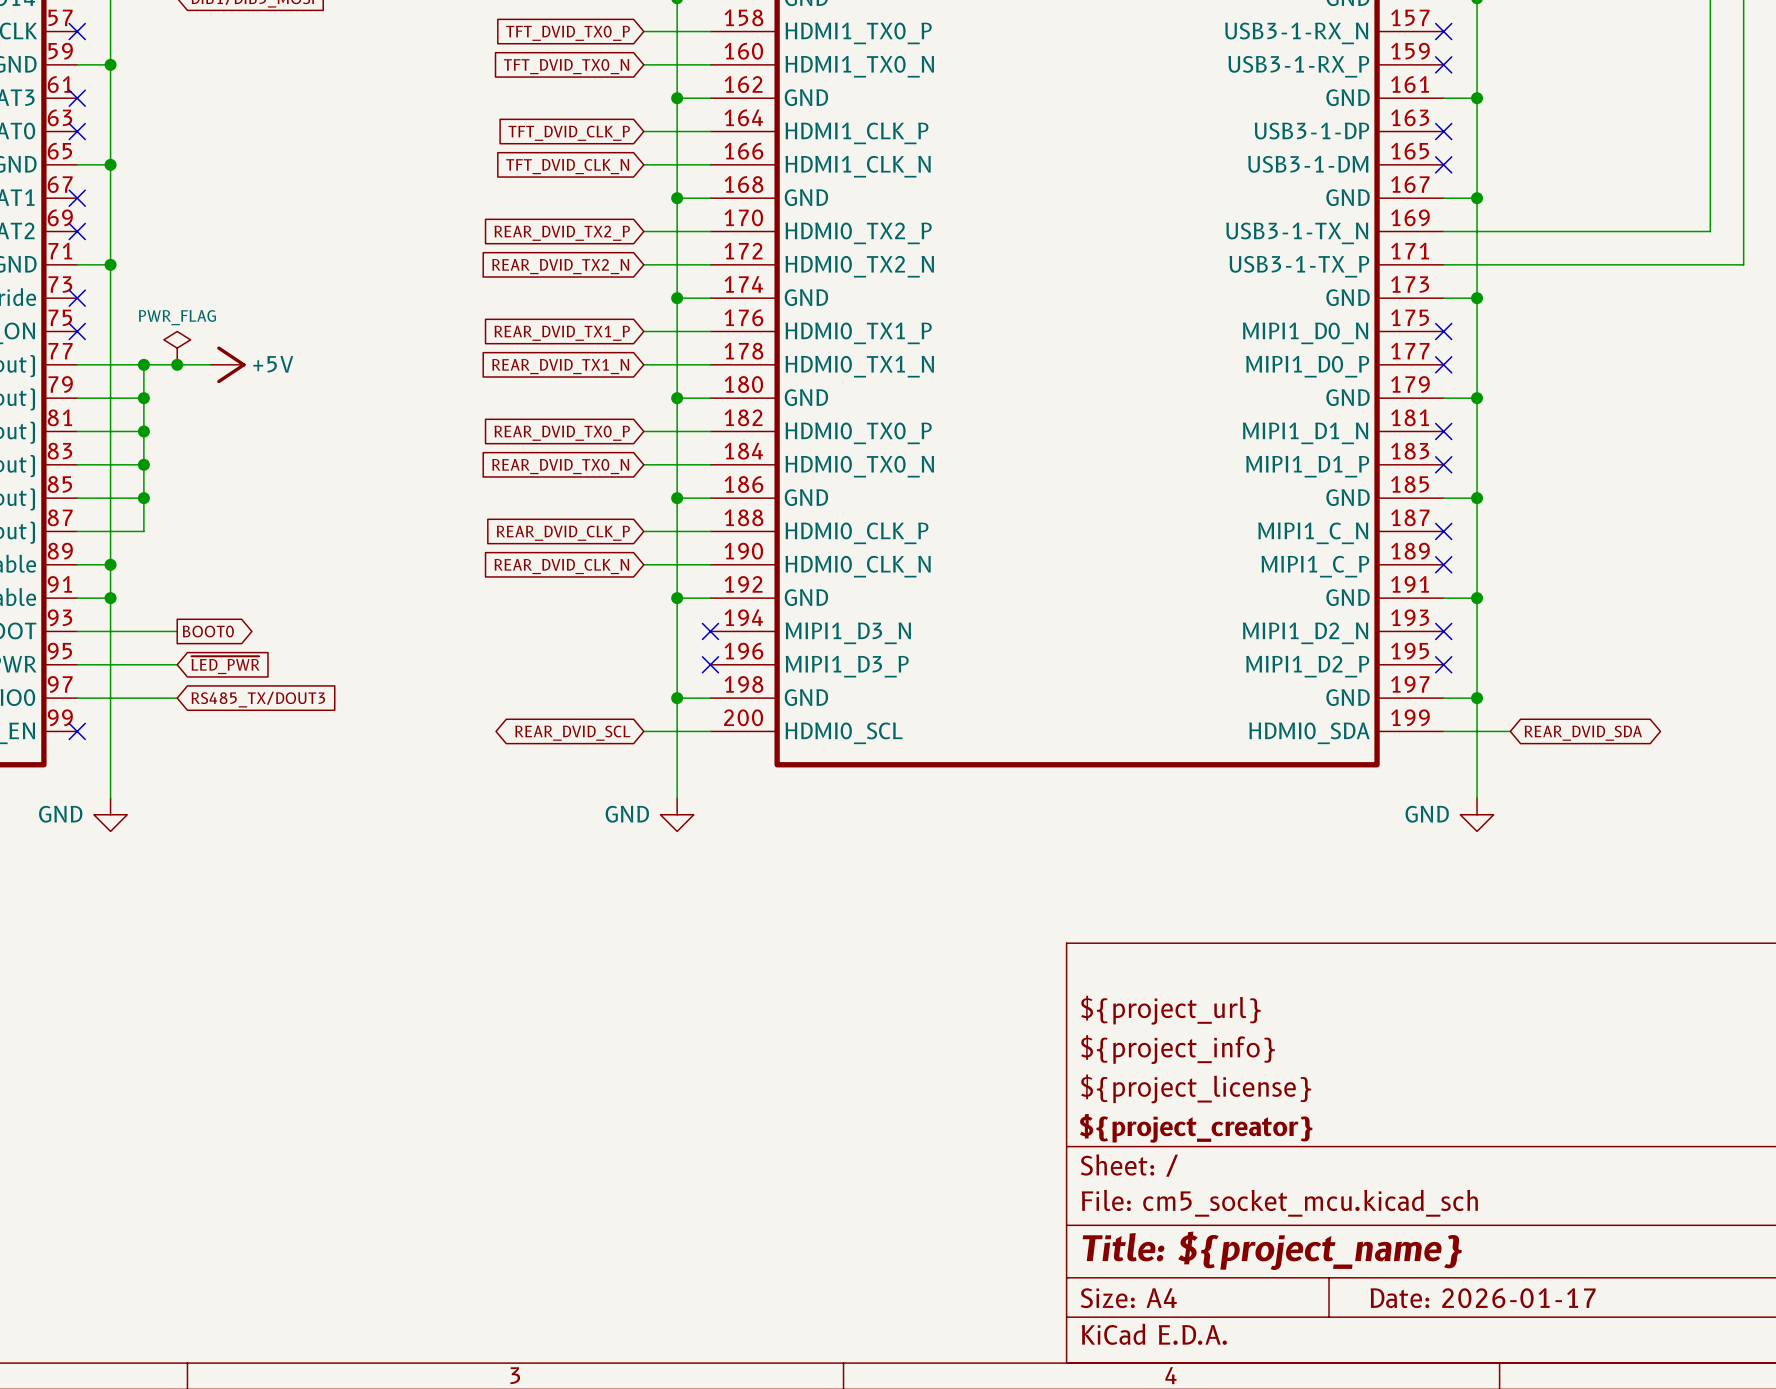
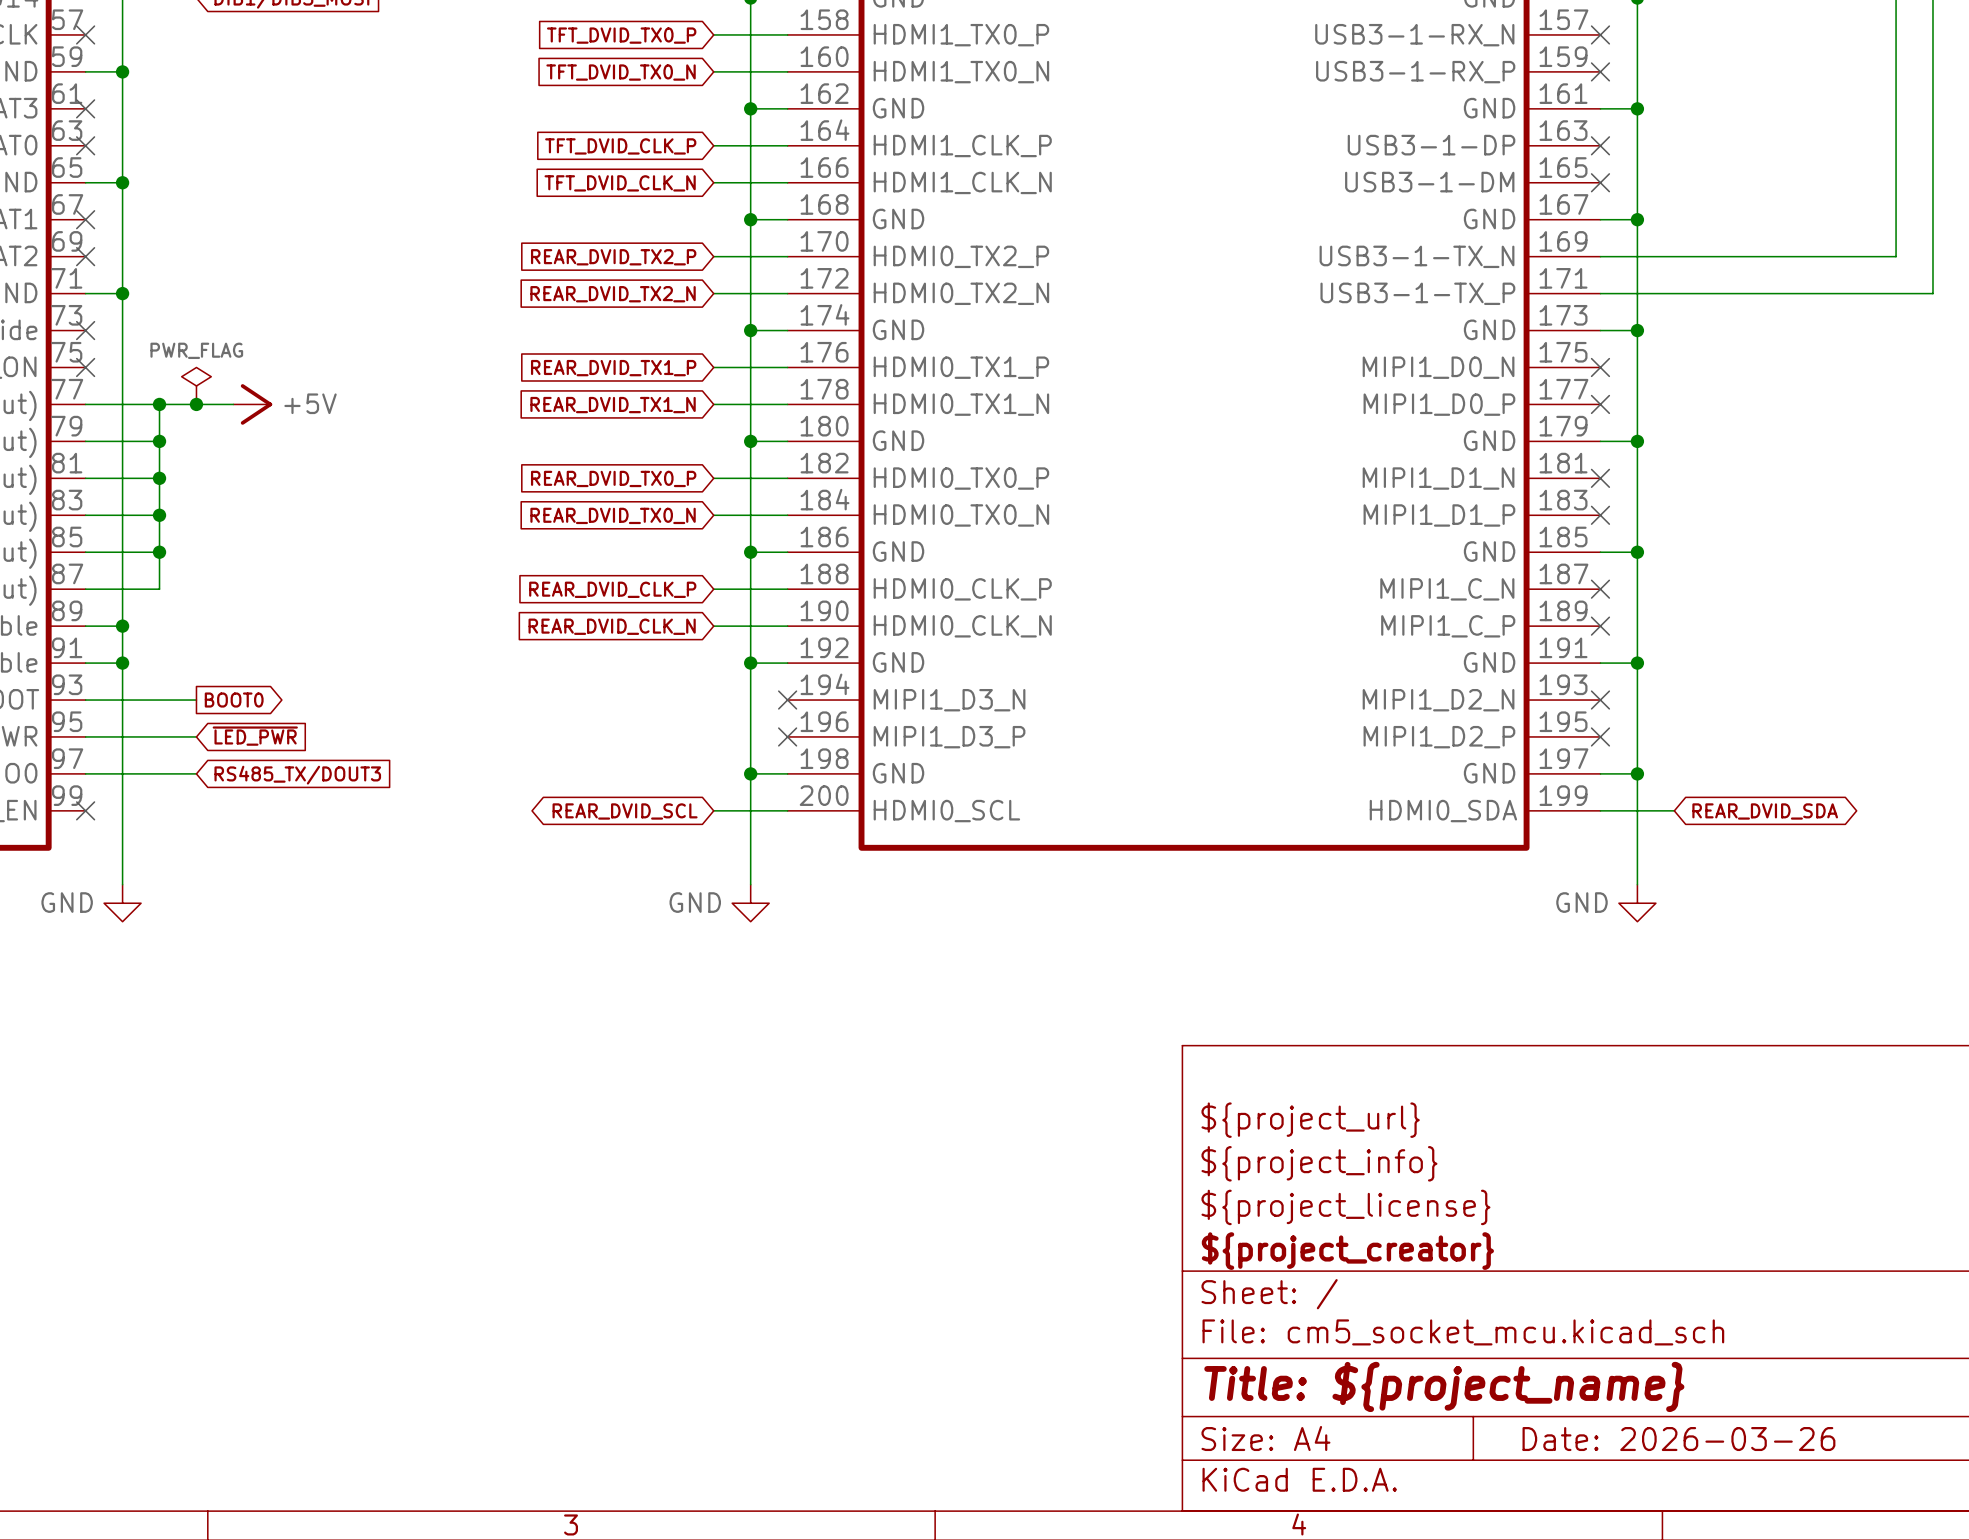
title block: Date: 2026-01-17 (1483, 1298) -> Date: 2026-03-26 (1678, 1439)

